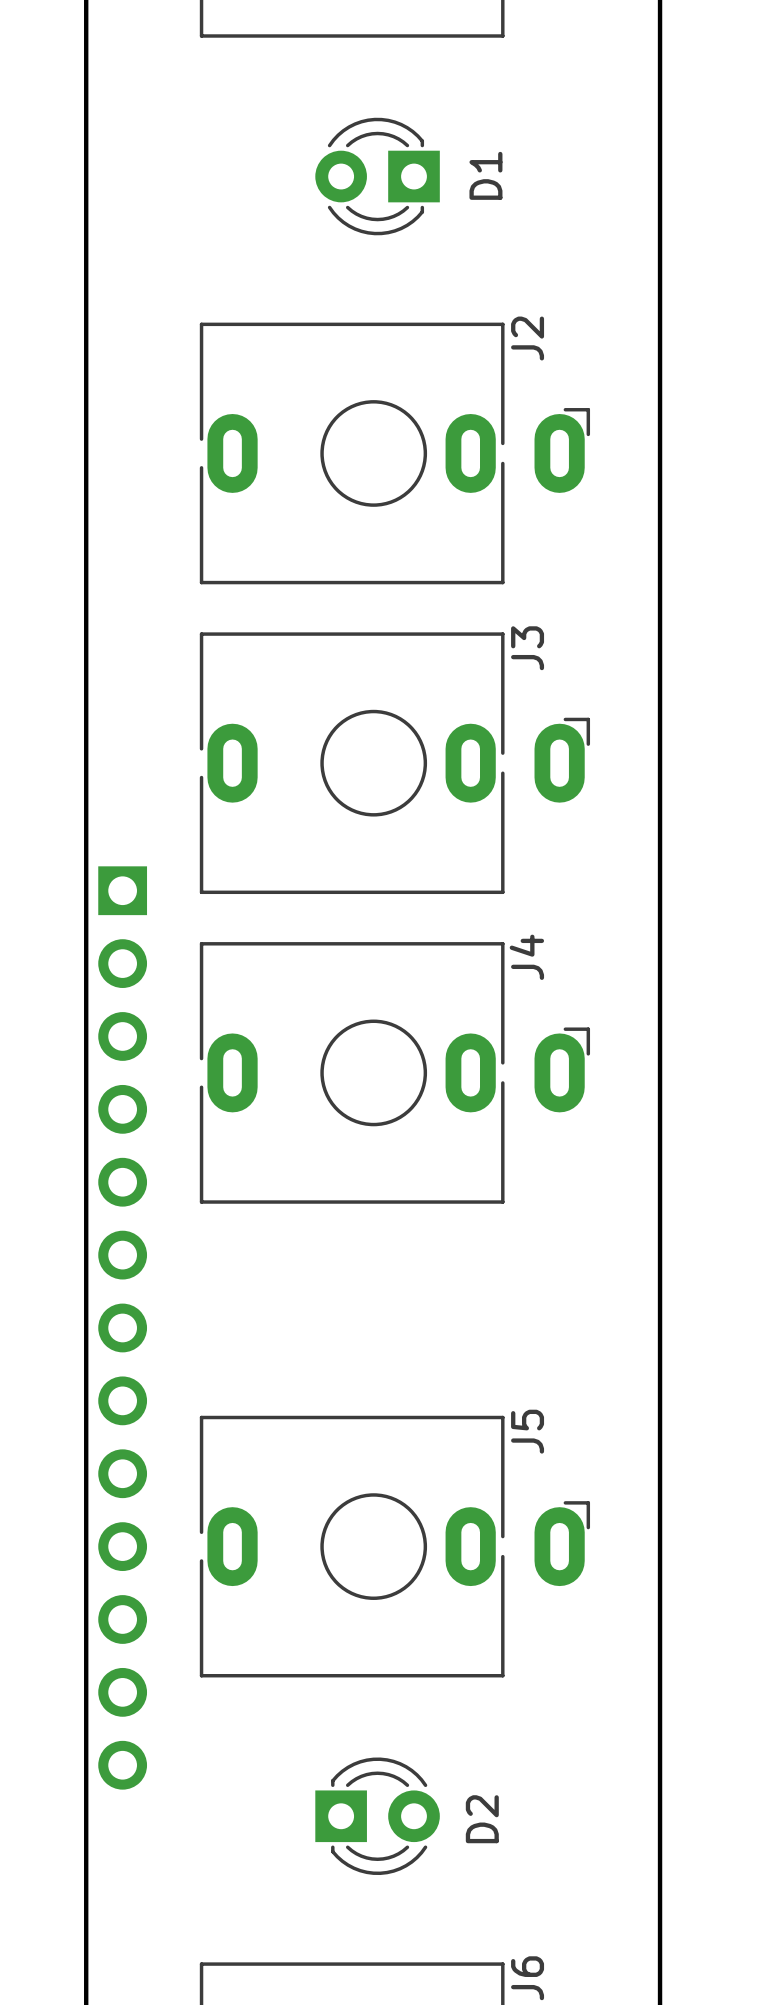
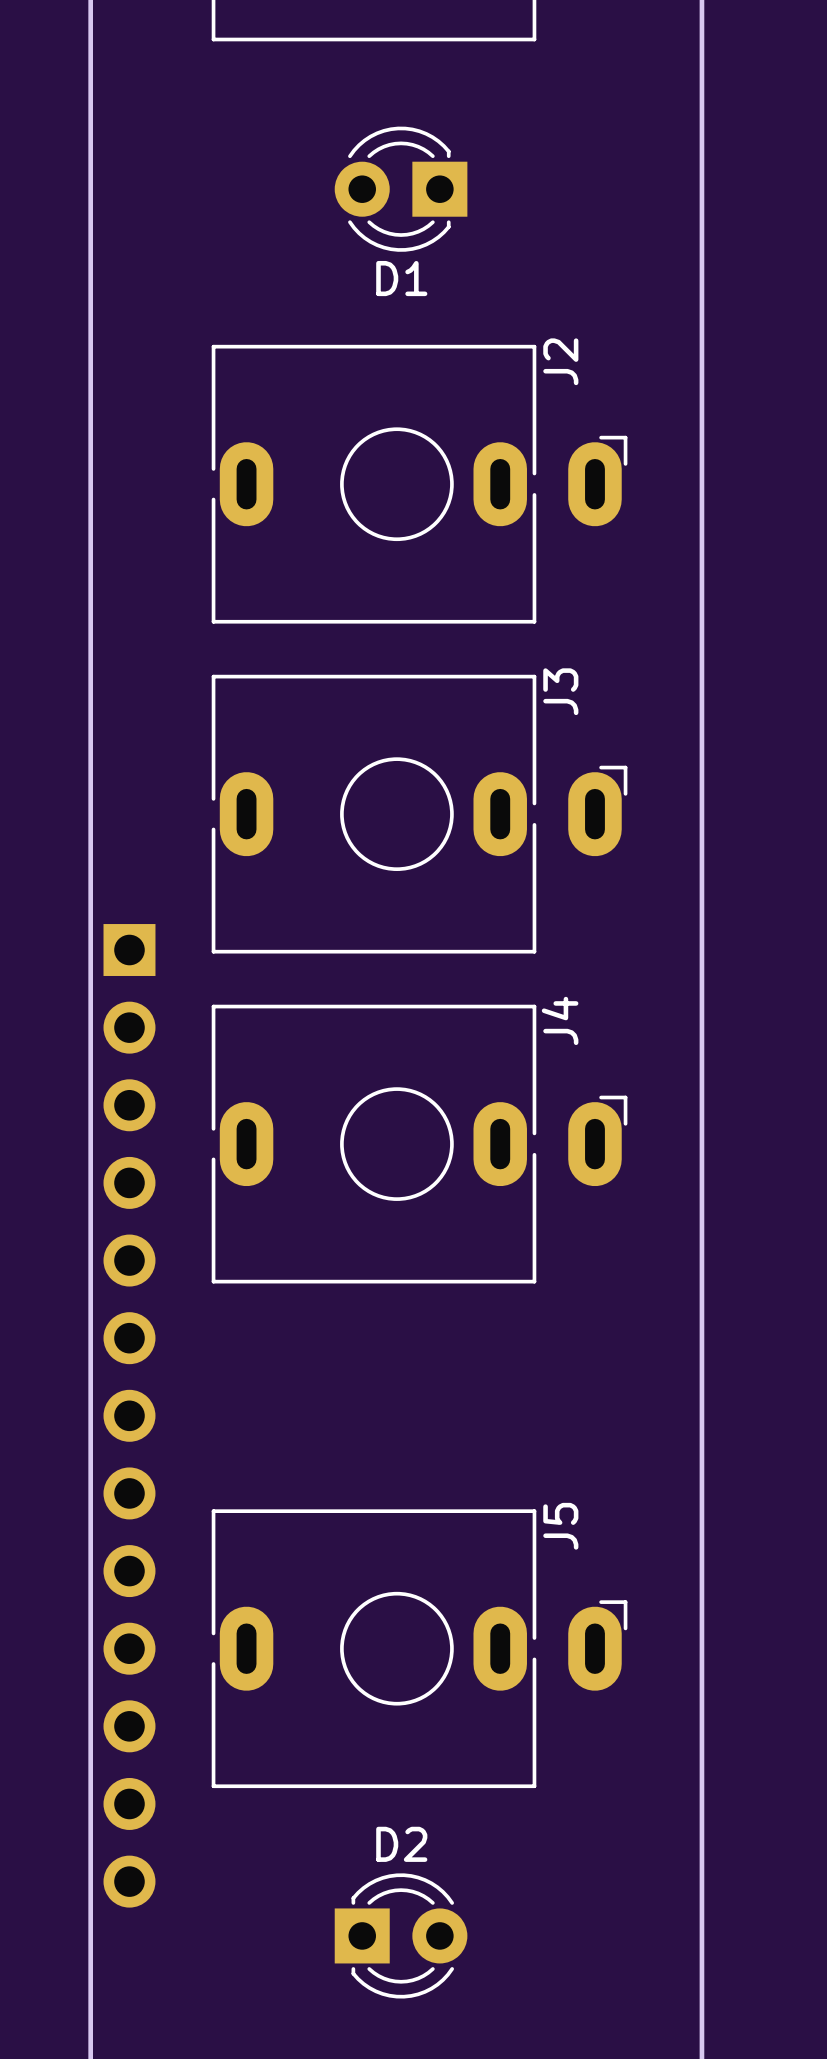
D1 name rotation: 0° (485, 175) -> 90° clockwise (401, 278)
D1 name position: D1 (485, 175) -> D1 (401, 278)
D2 name rotation: 0° (482, 1819) -> 90° clockwise (401, 1844)
D2 name position: D2 (482, 1819) -> D2 (401, 1844)

